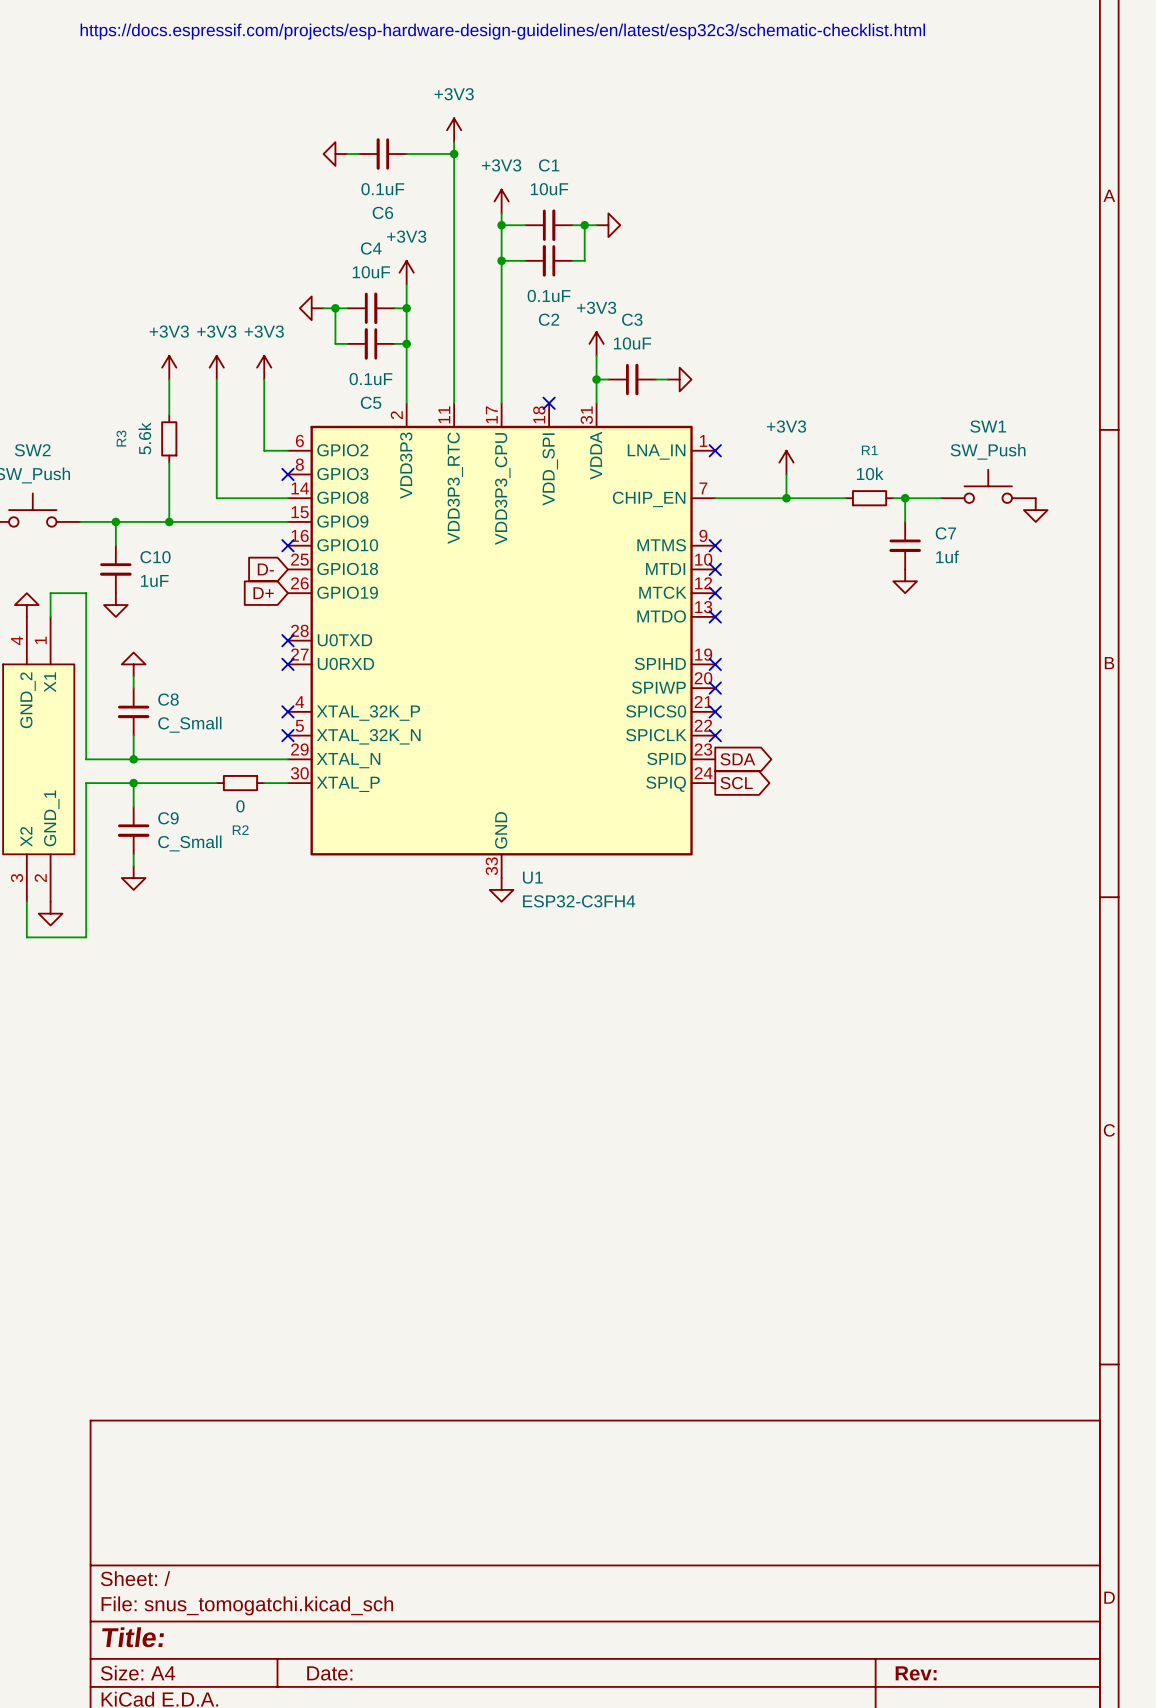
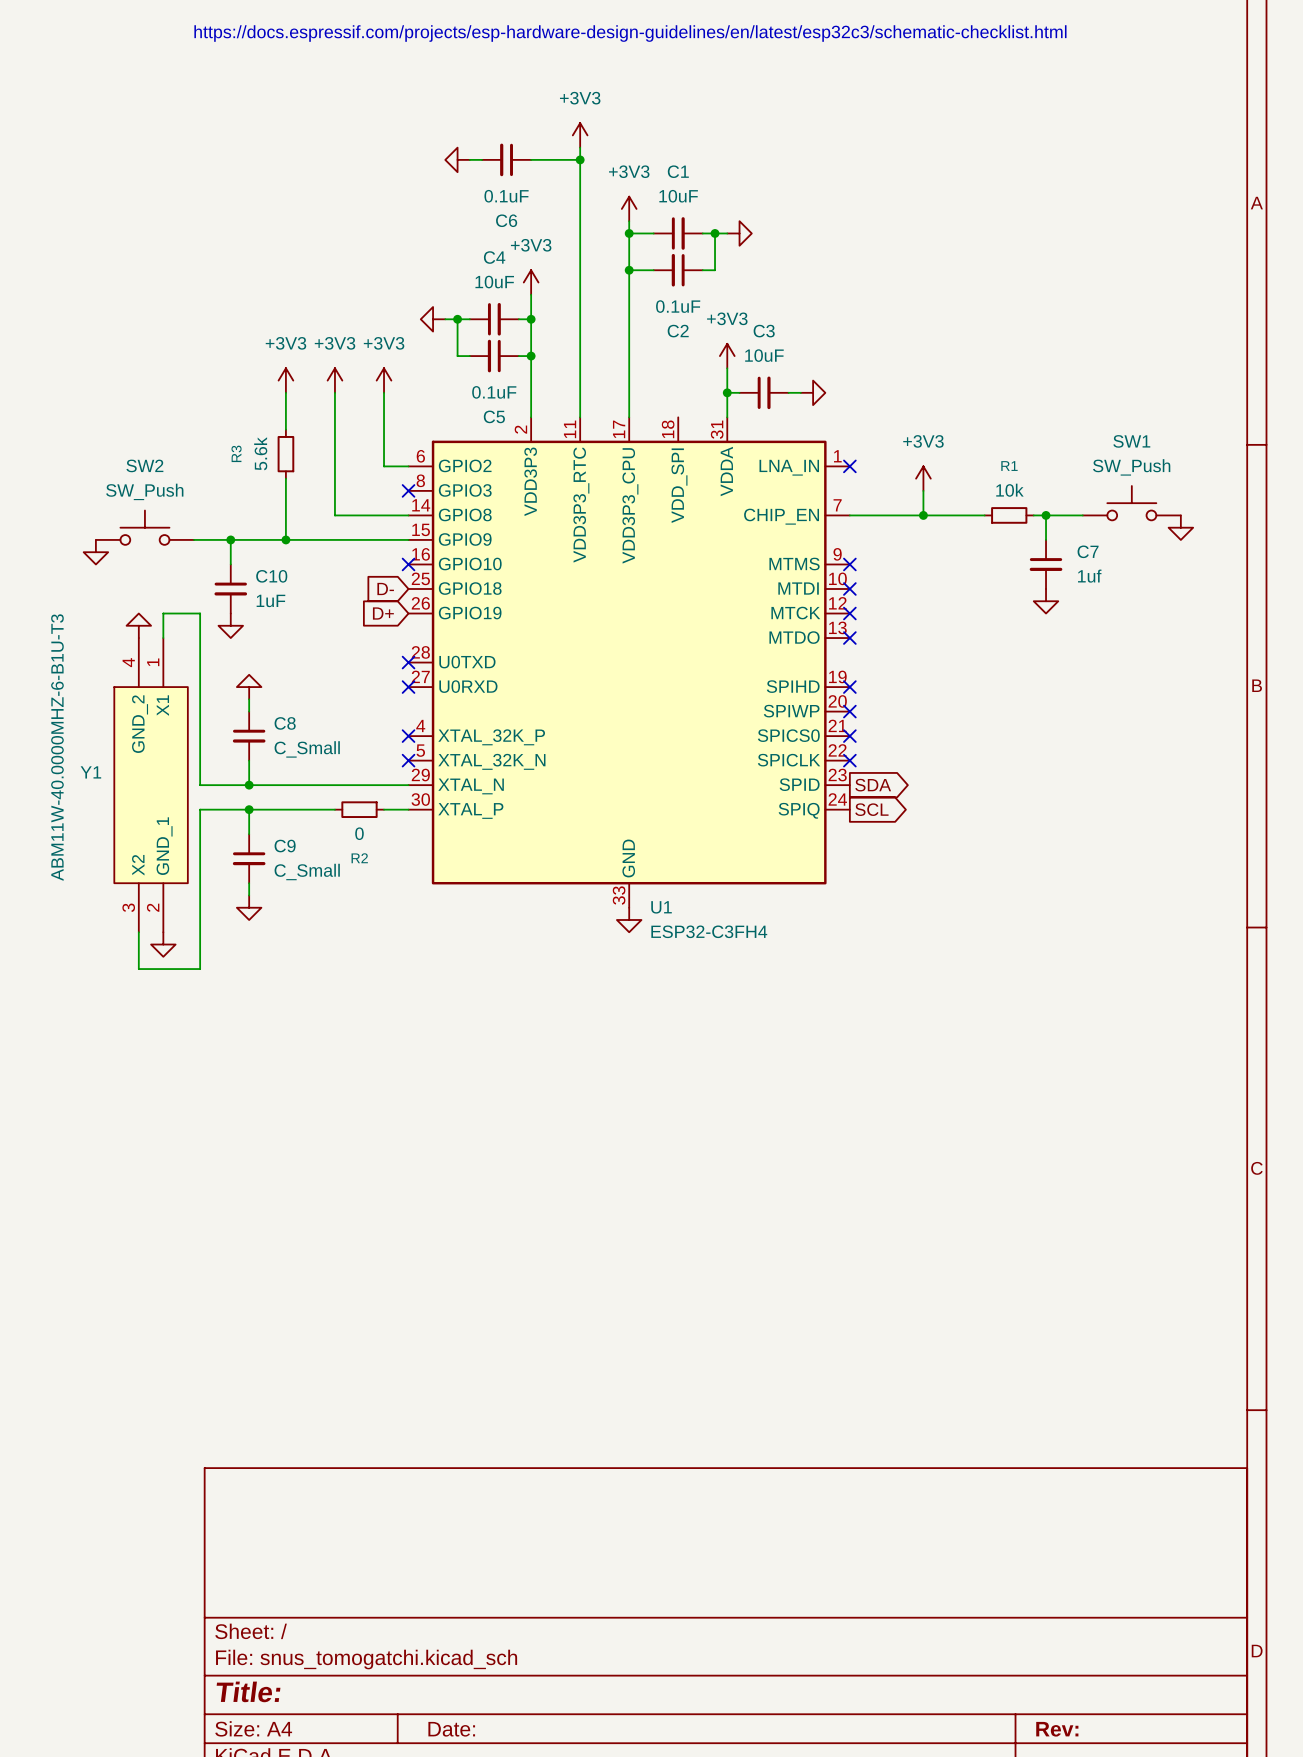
no-connect mark: (549, 403) -> none

